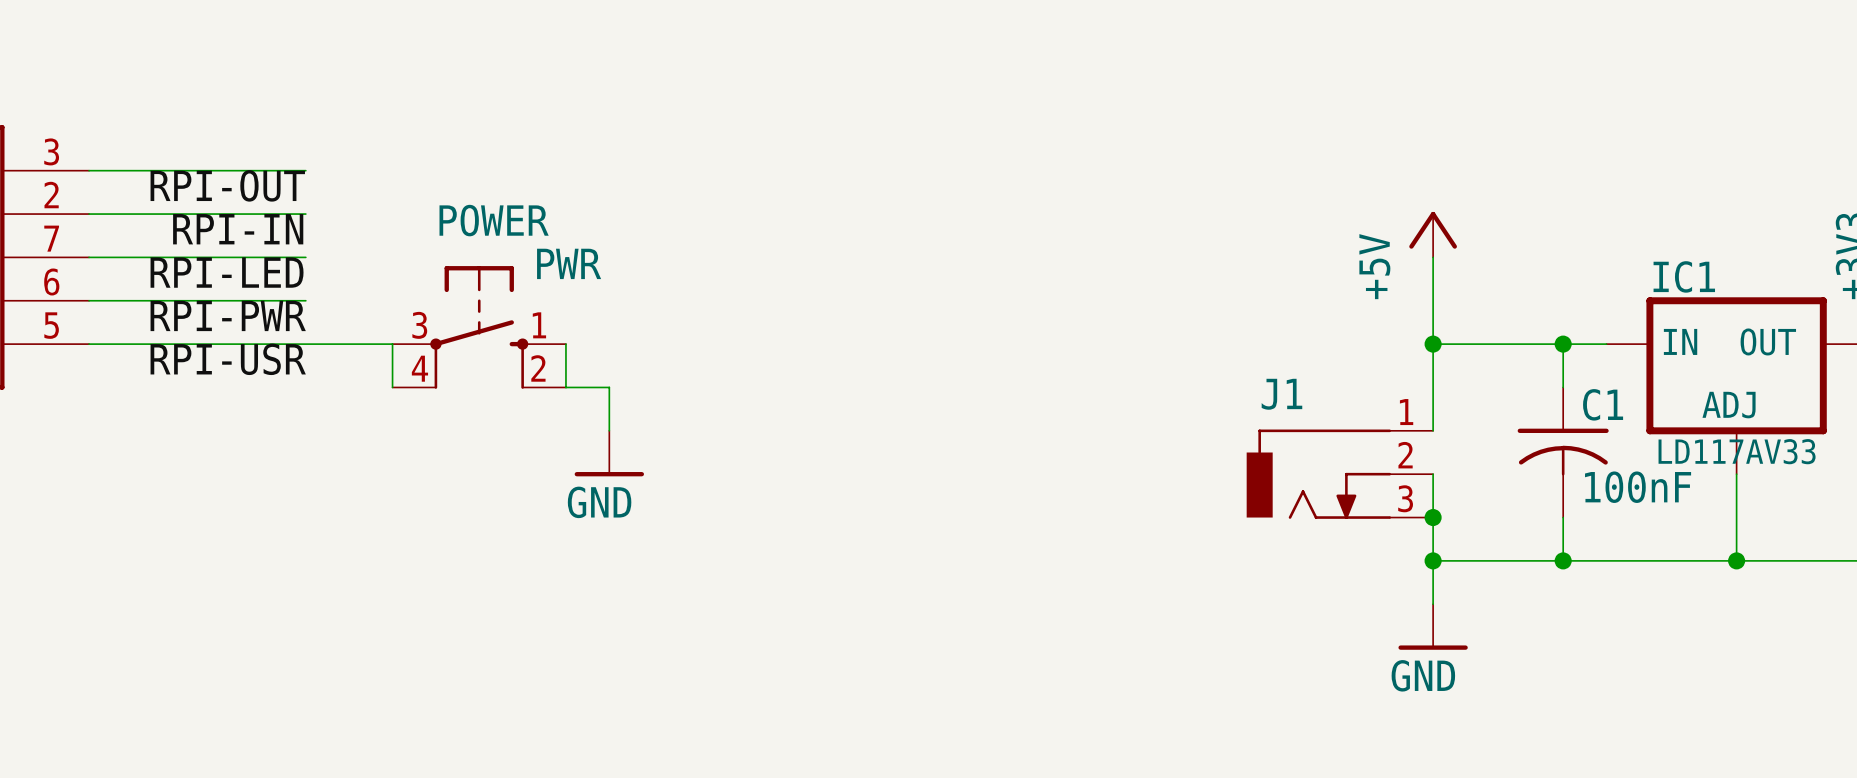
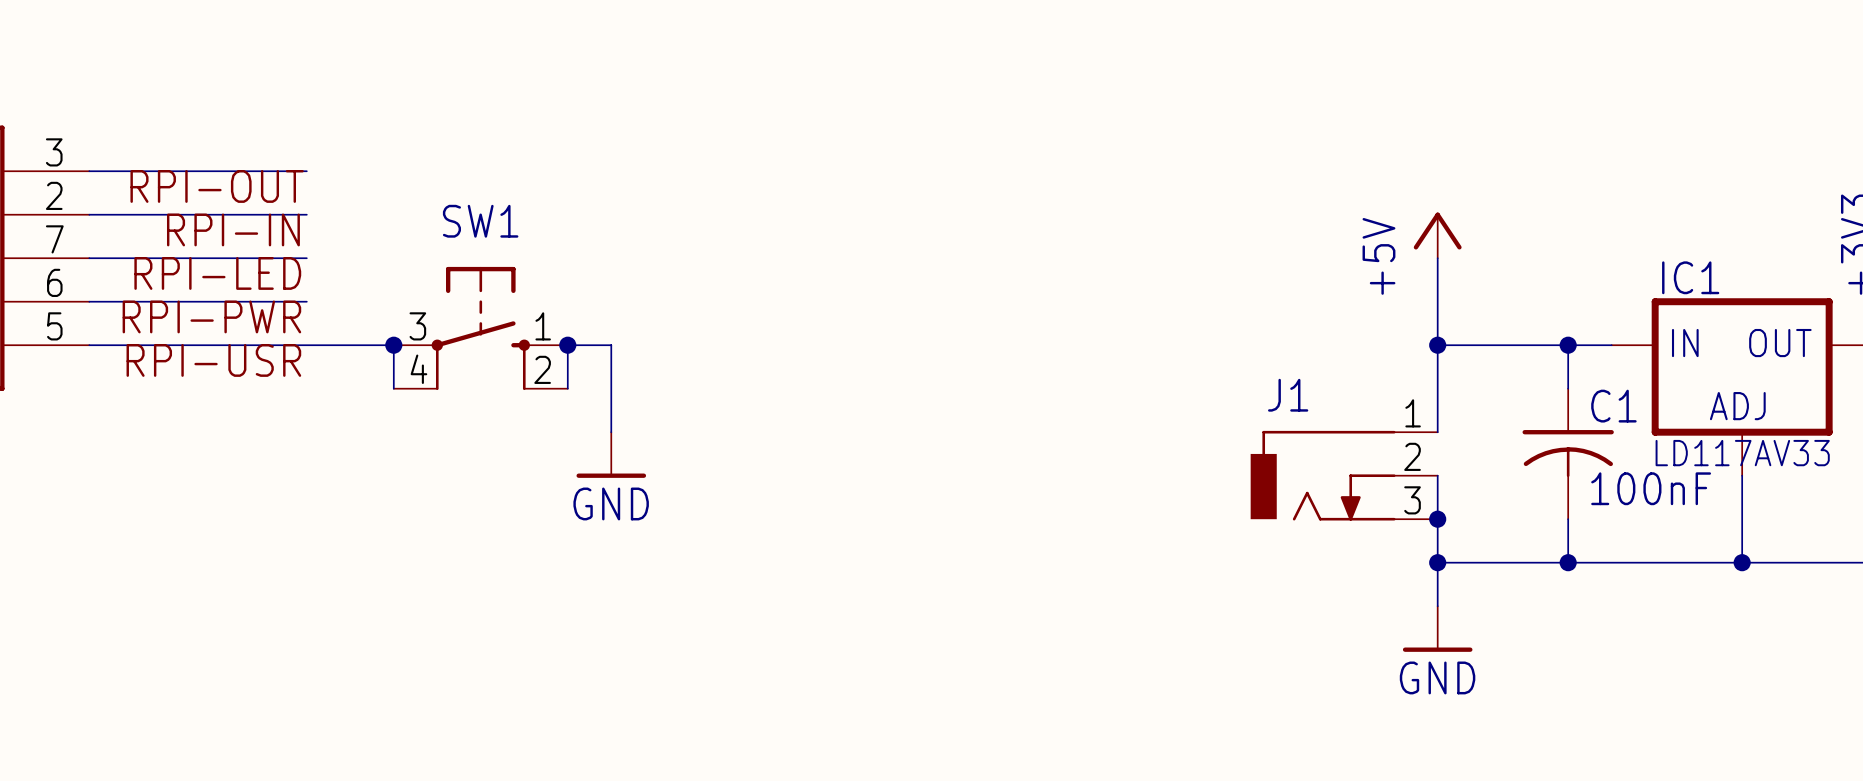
POWER name: POWER (494, 220) -> SW1 (480, 221)
POWER value: PWR (569, 263) -> none
junction: none -> (393, 345)
junction: none -> (567, 345)
wire: (565, 387) (609, 387) -> (567, 345) (611, 345) (611, 388)

